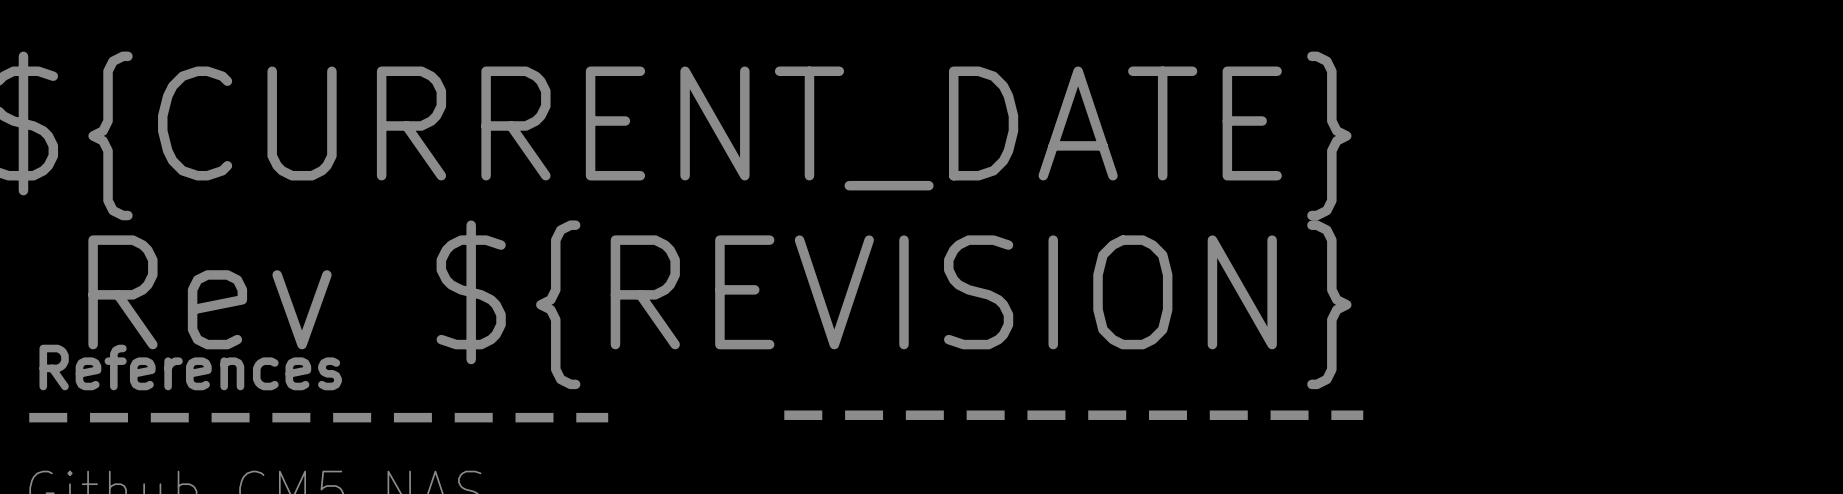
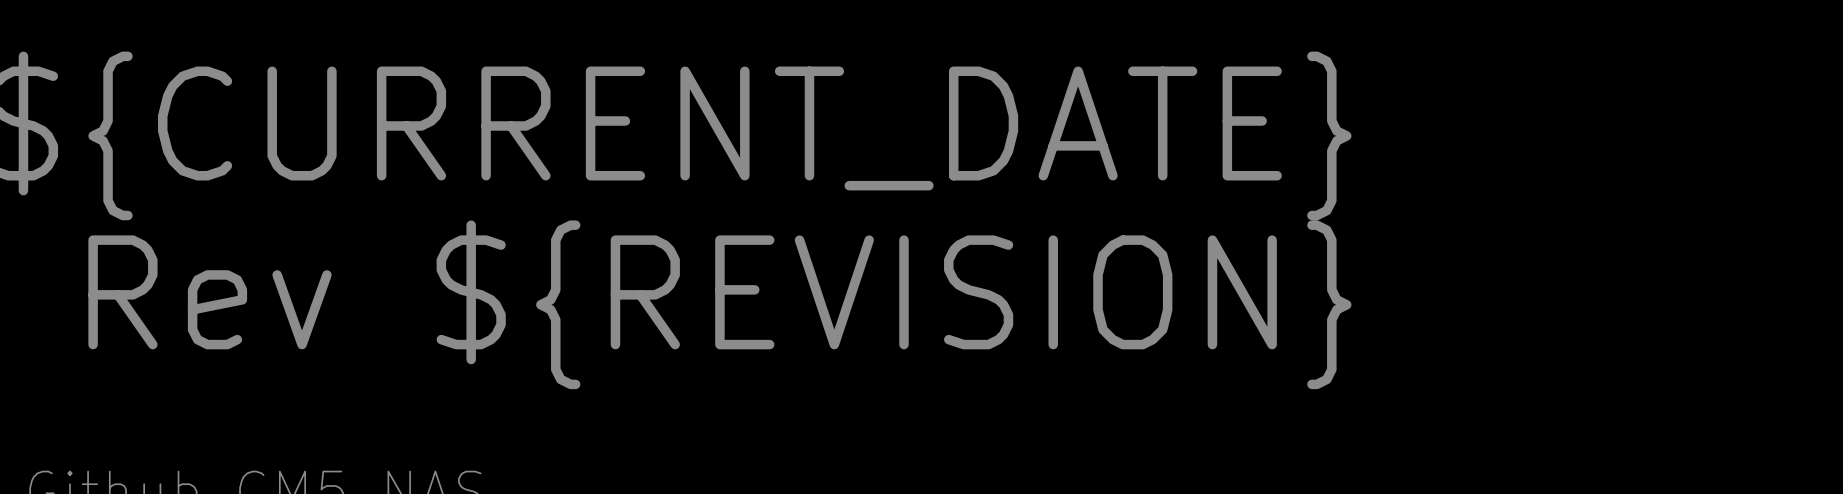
text: References (190, 367) -> none
line: (784, 415) (1363, 415) -> none
line: (29, 417) (608, 417) -> none

